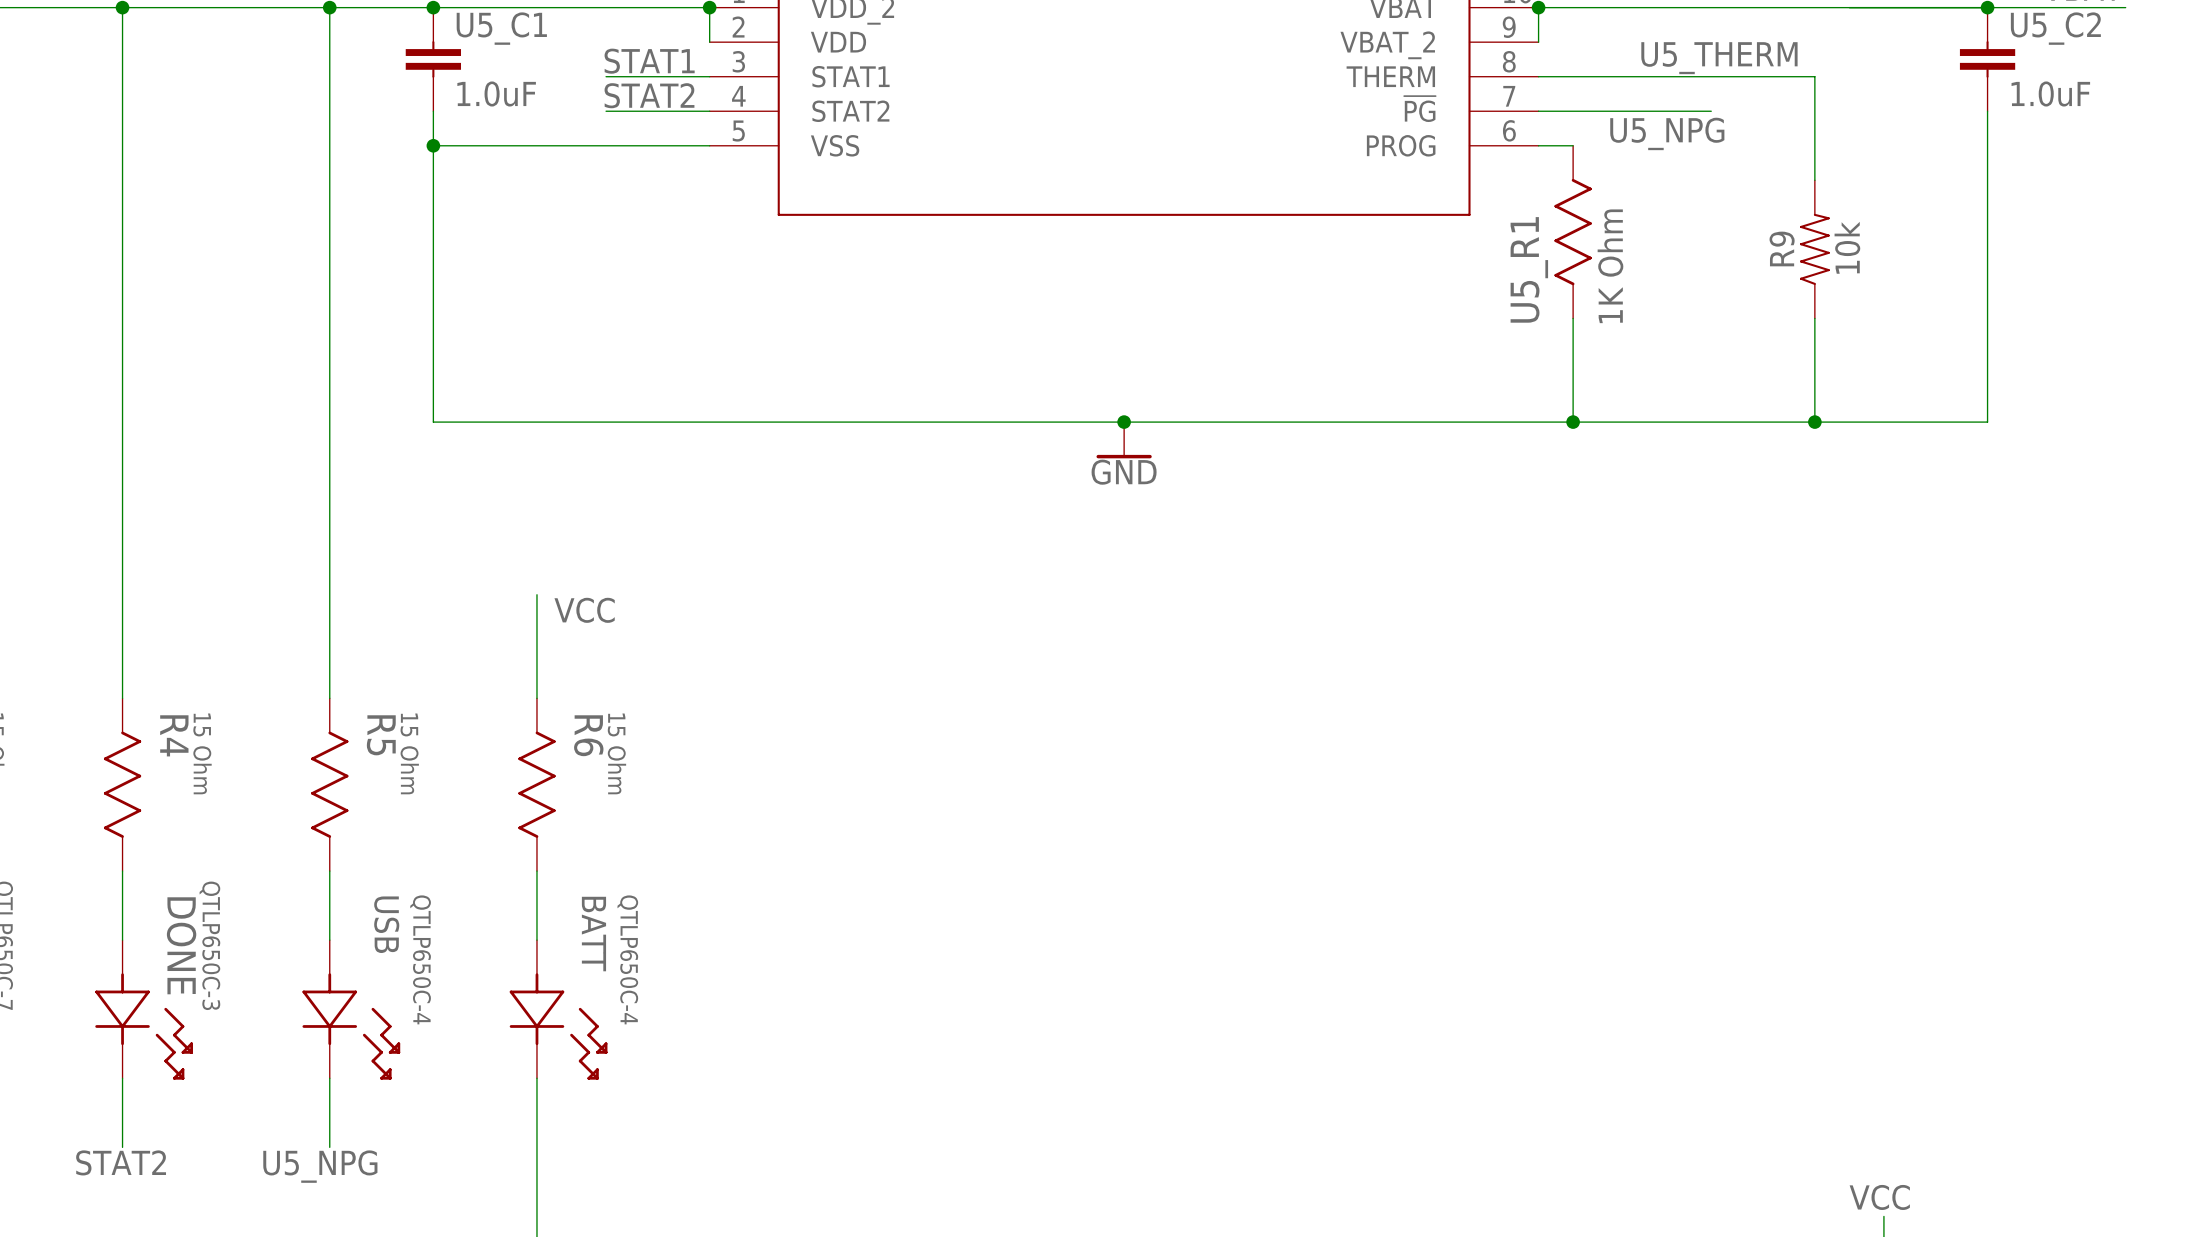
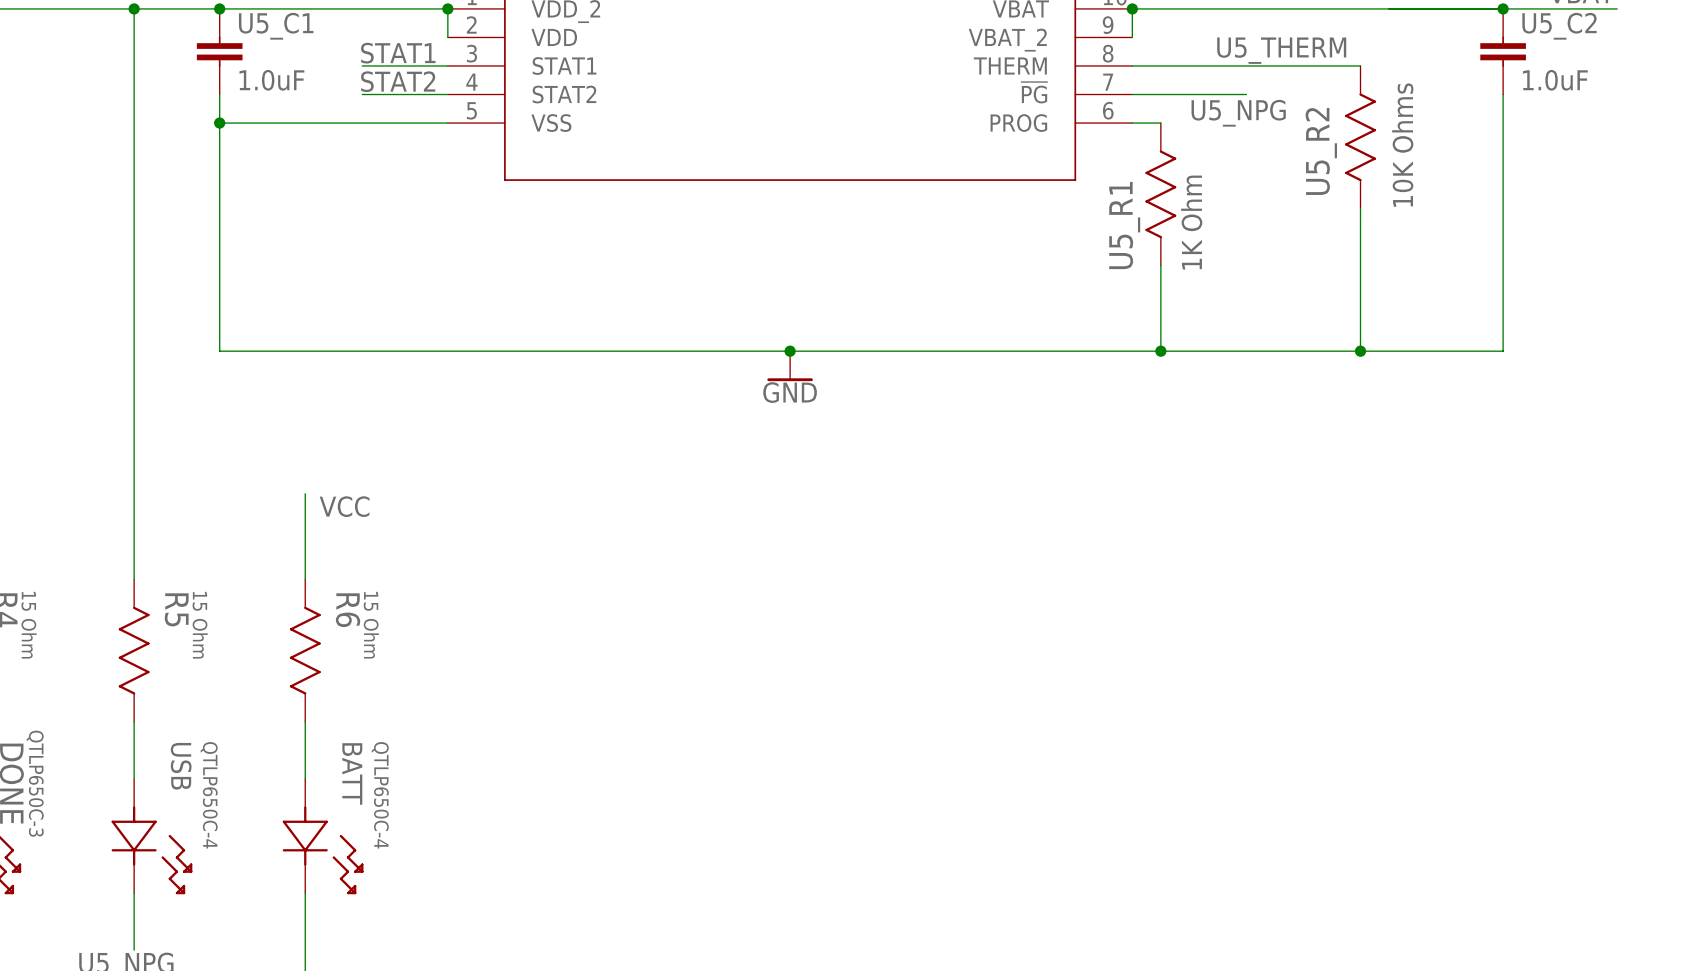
wire: (1814, 76) (1814, 180) -> none
wire: (1676, 111) (1711, 111) -> none
U5_R2: none -> 10K Ohms (1360, 137)
R9: 10k (1814, 249) -> none

